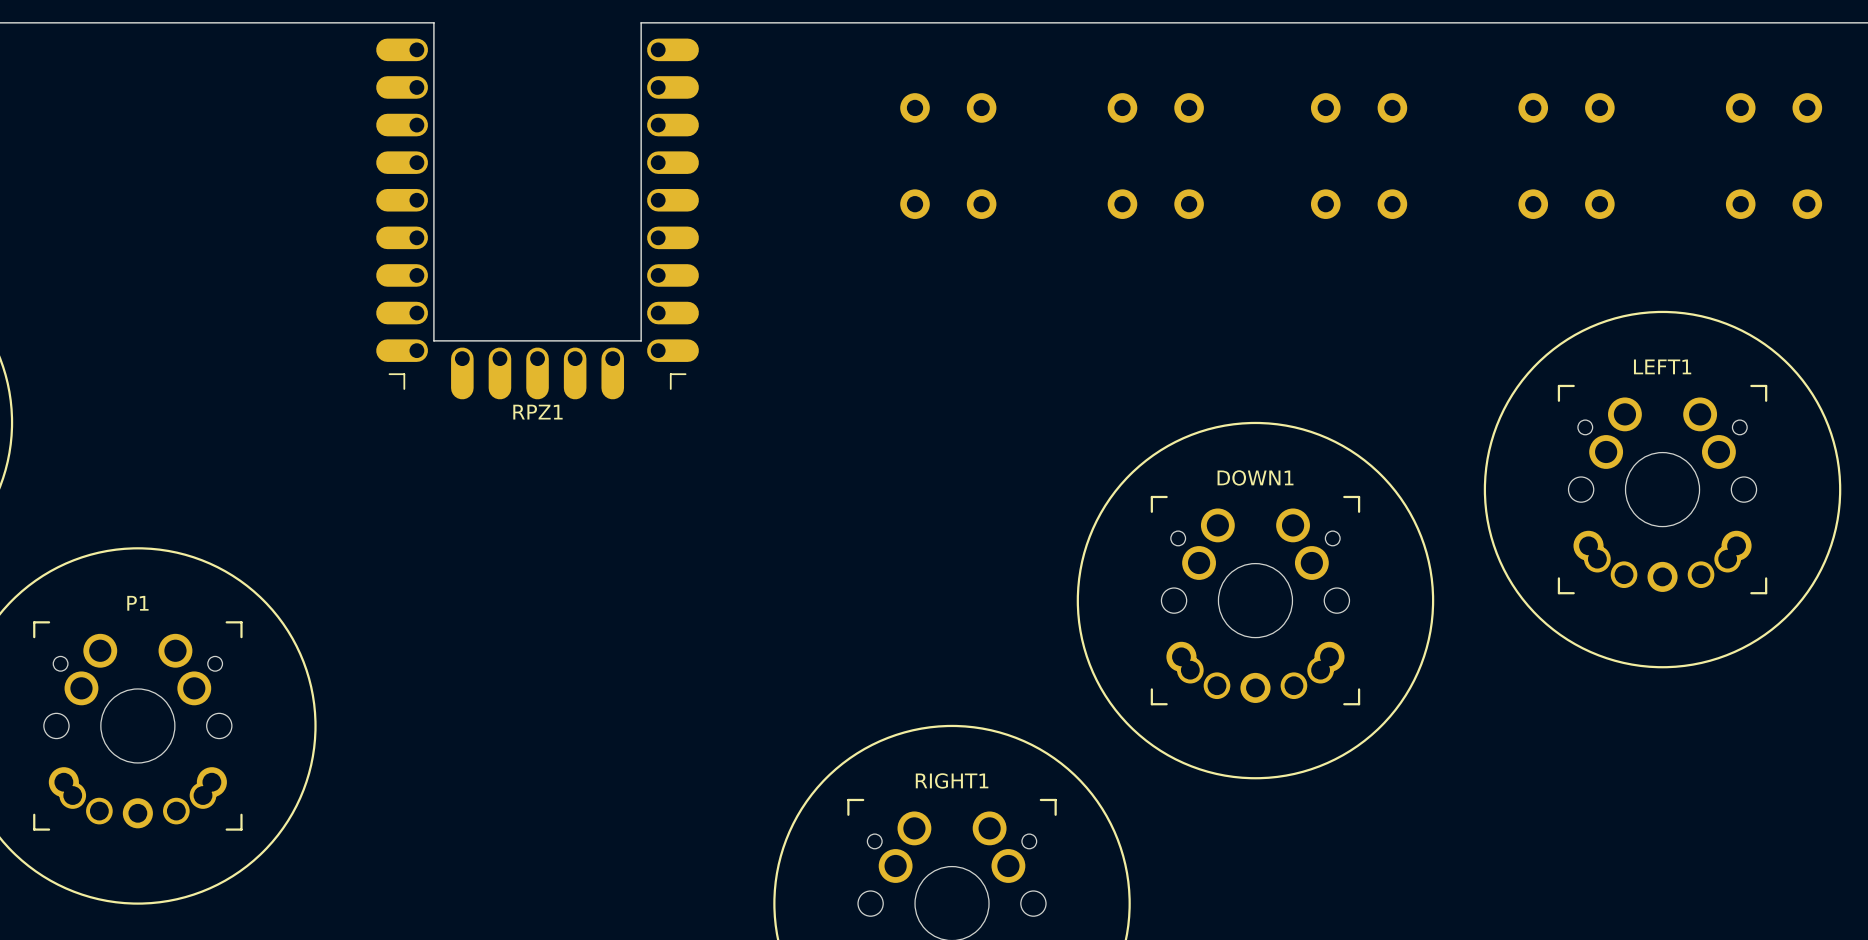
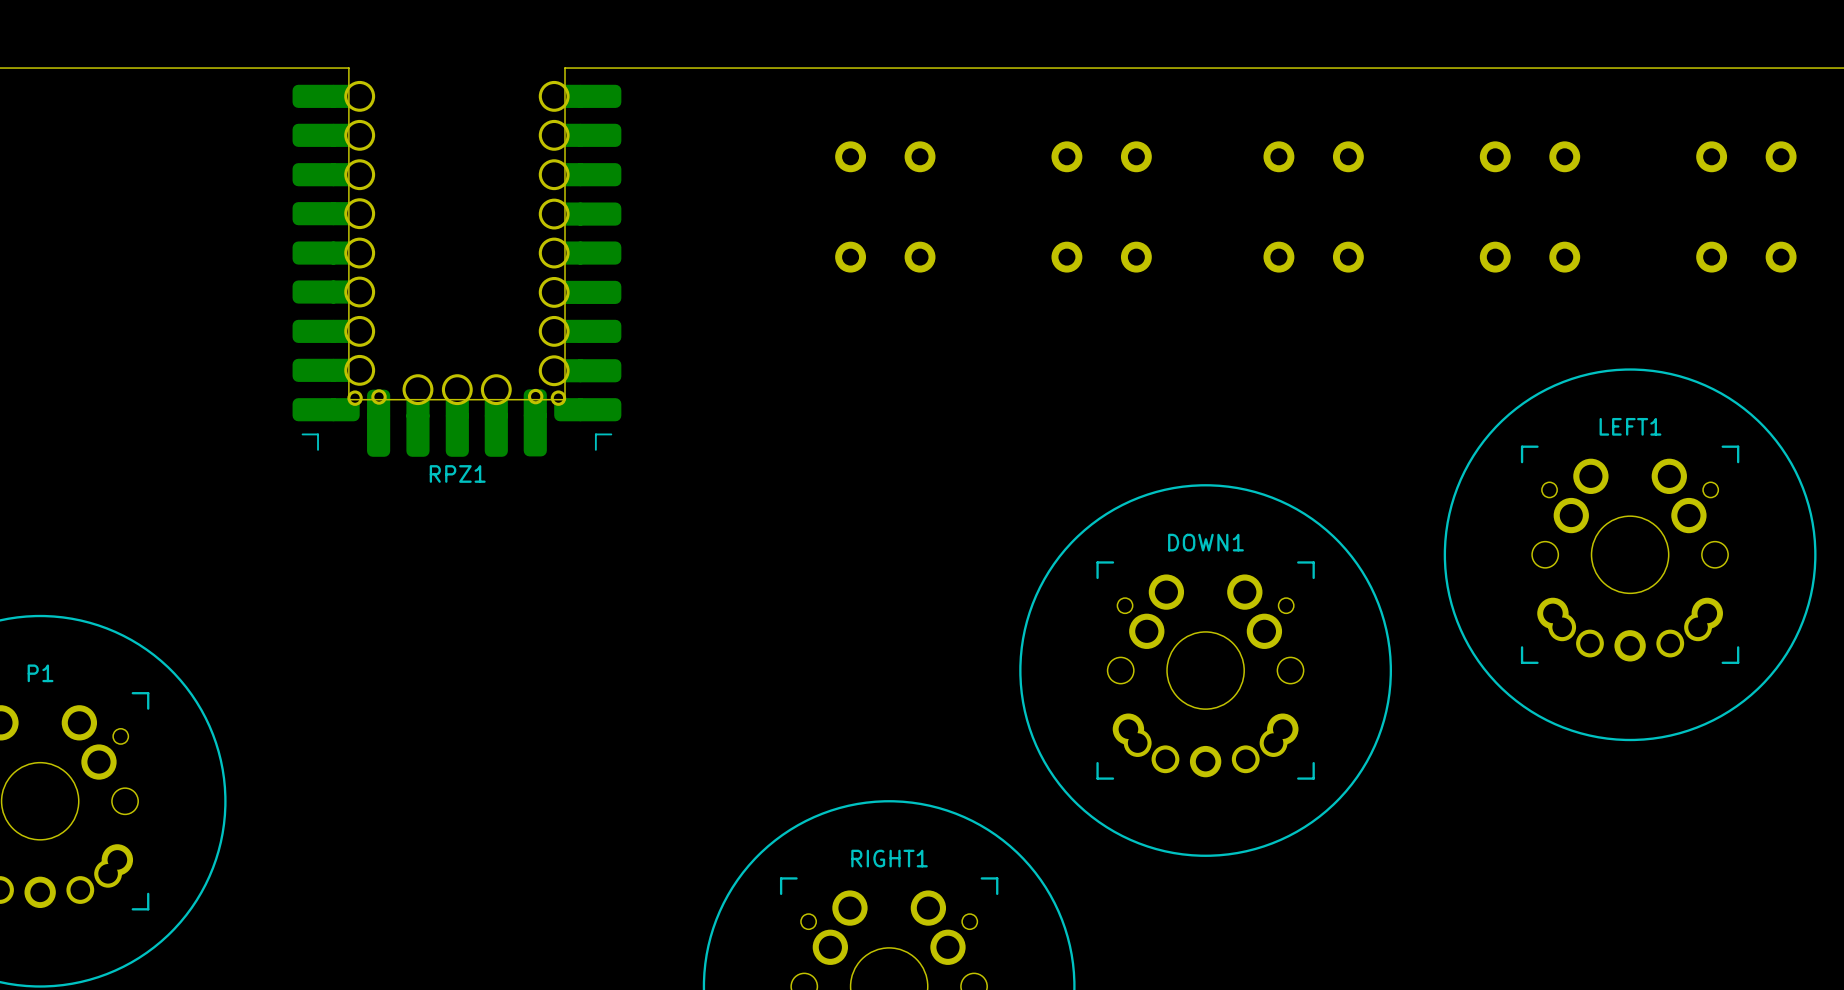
RPZ1 footprint: [376, 38, 699, 400] -> [292, 80, 622, 457]

